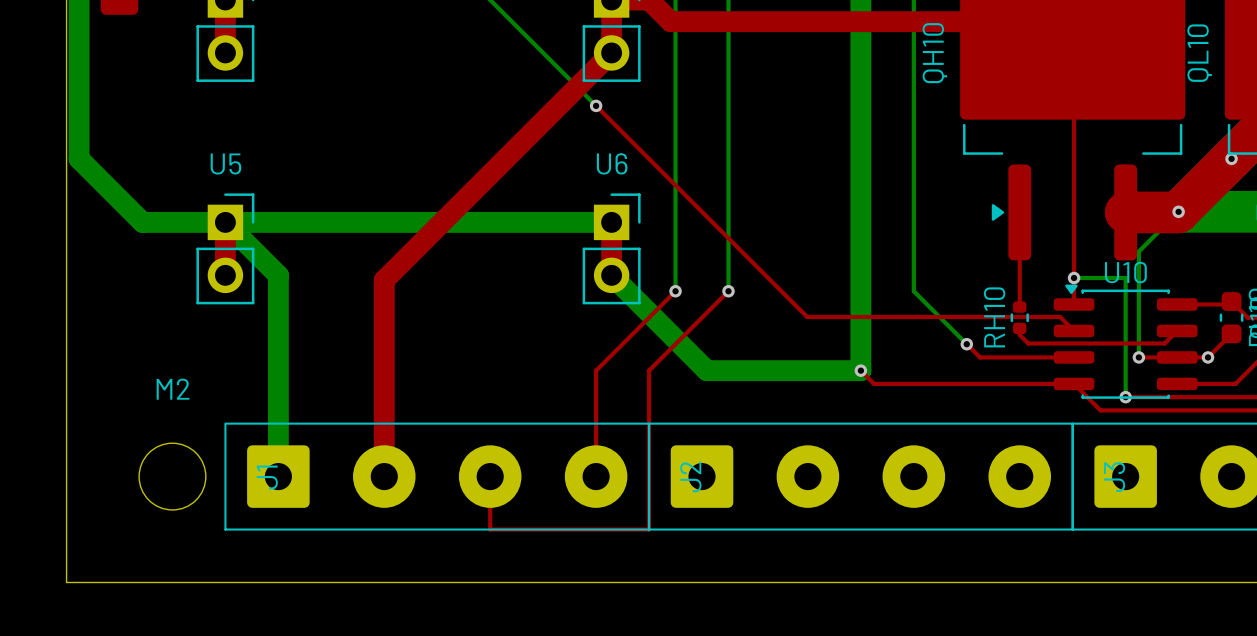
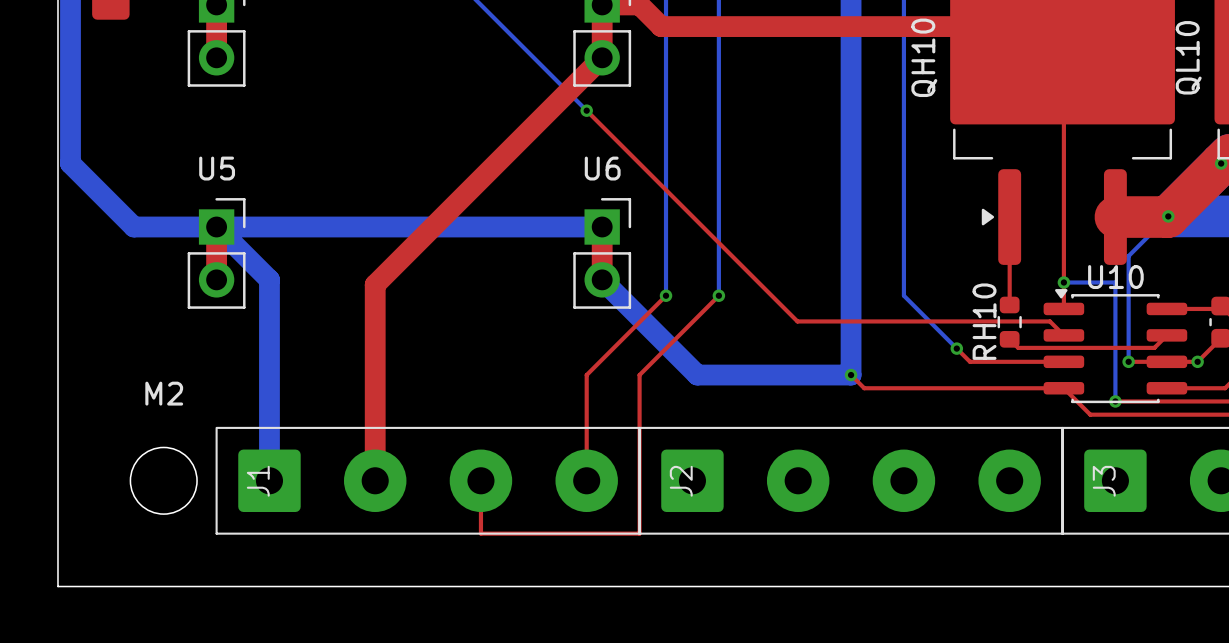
RH10 footprint: [1010, 301, 1029, 334] -> [997, 296, 1022, 348]

